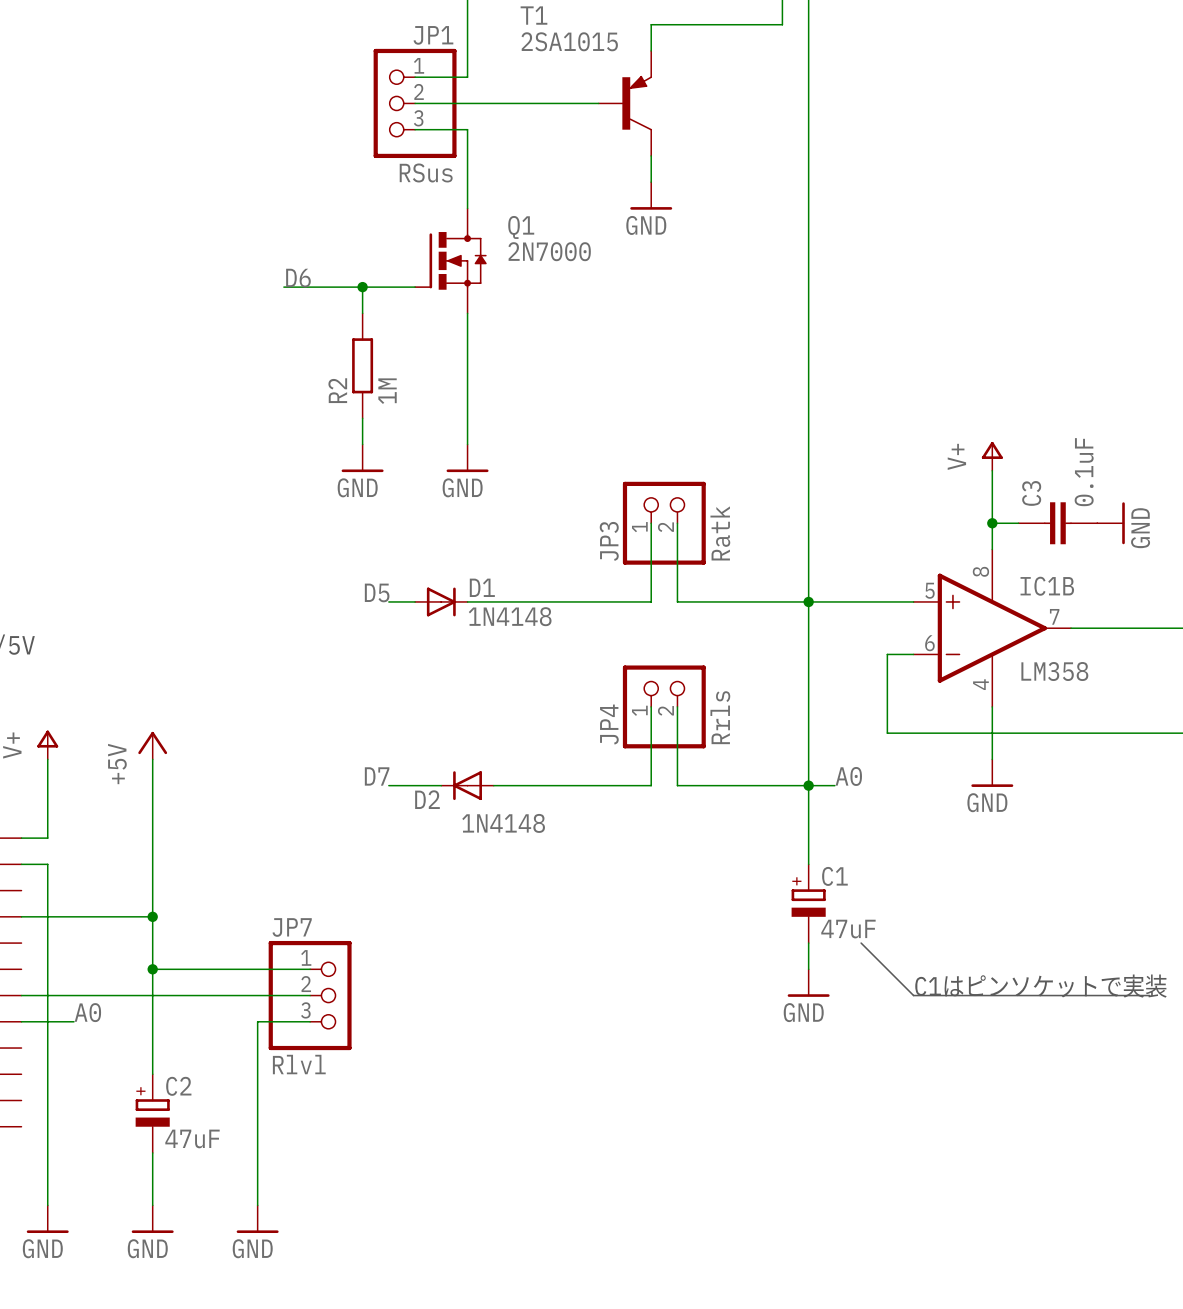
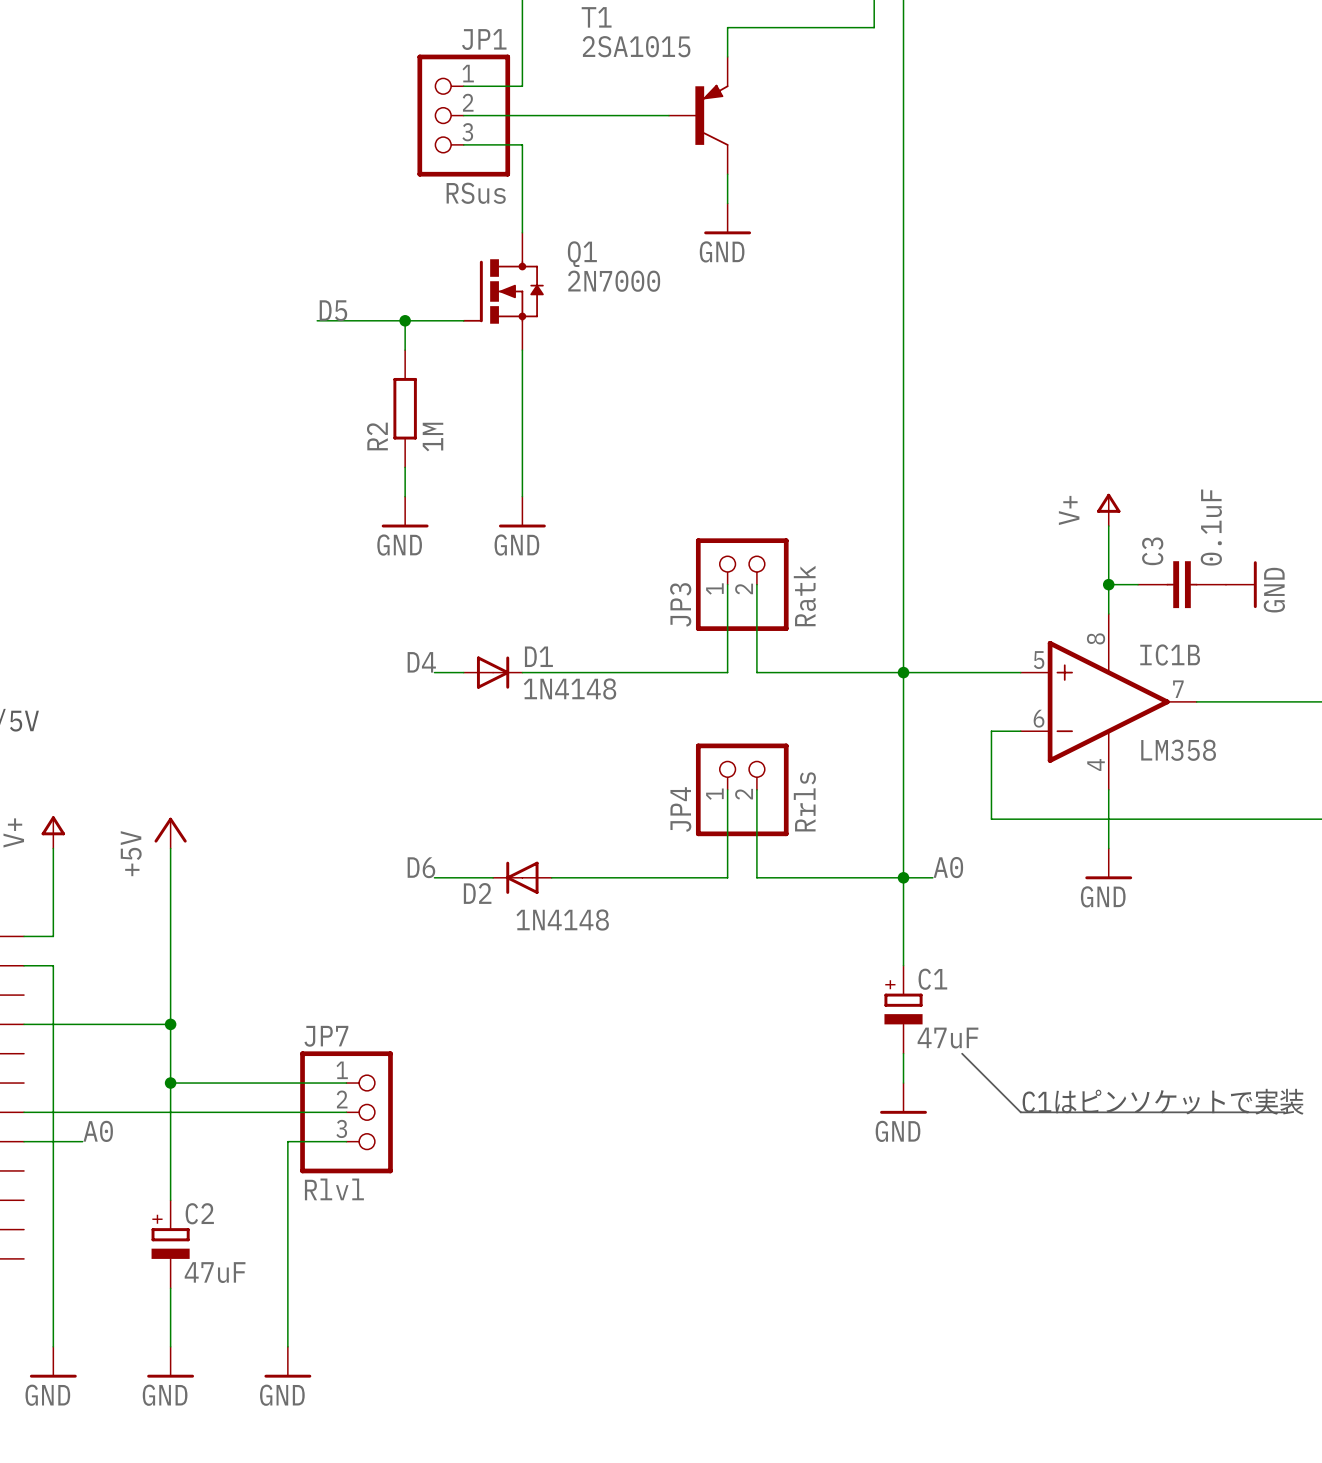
label: D6 (298, 278) -> D5 (333, 310)
label: D5 (377, 592) -> D4 (421, 662)
label: D7 (377, 776) -> D6 (421, 867)

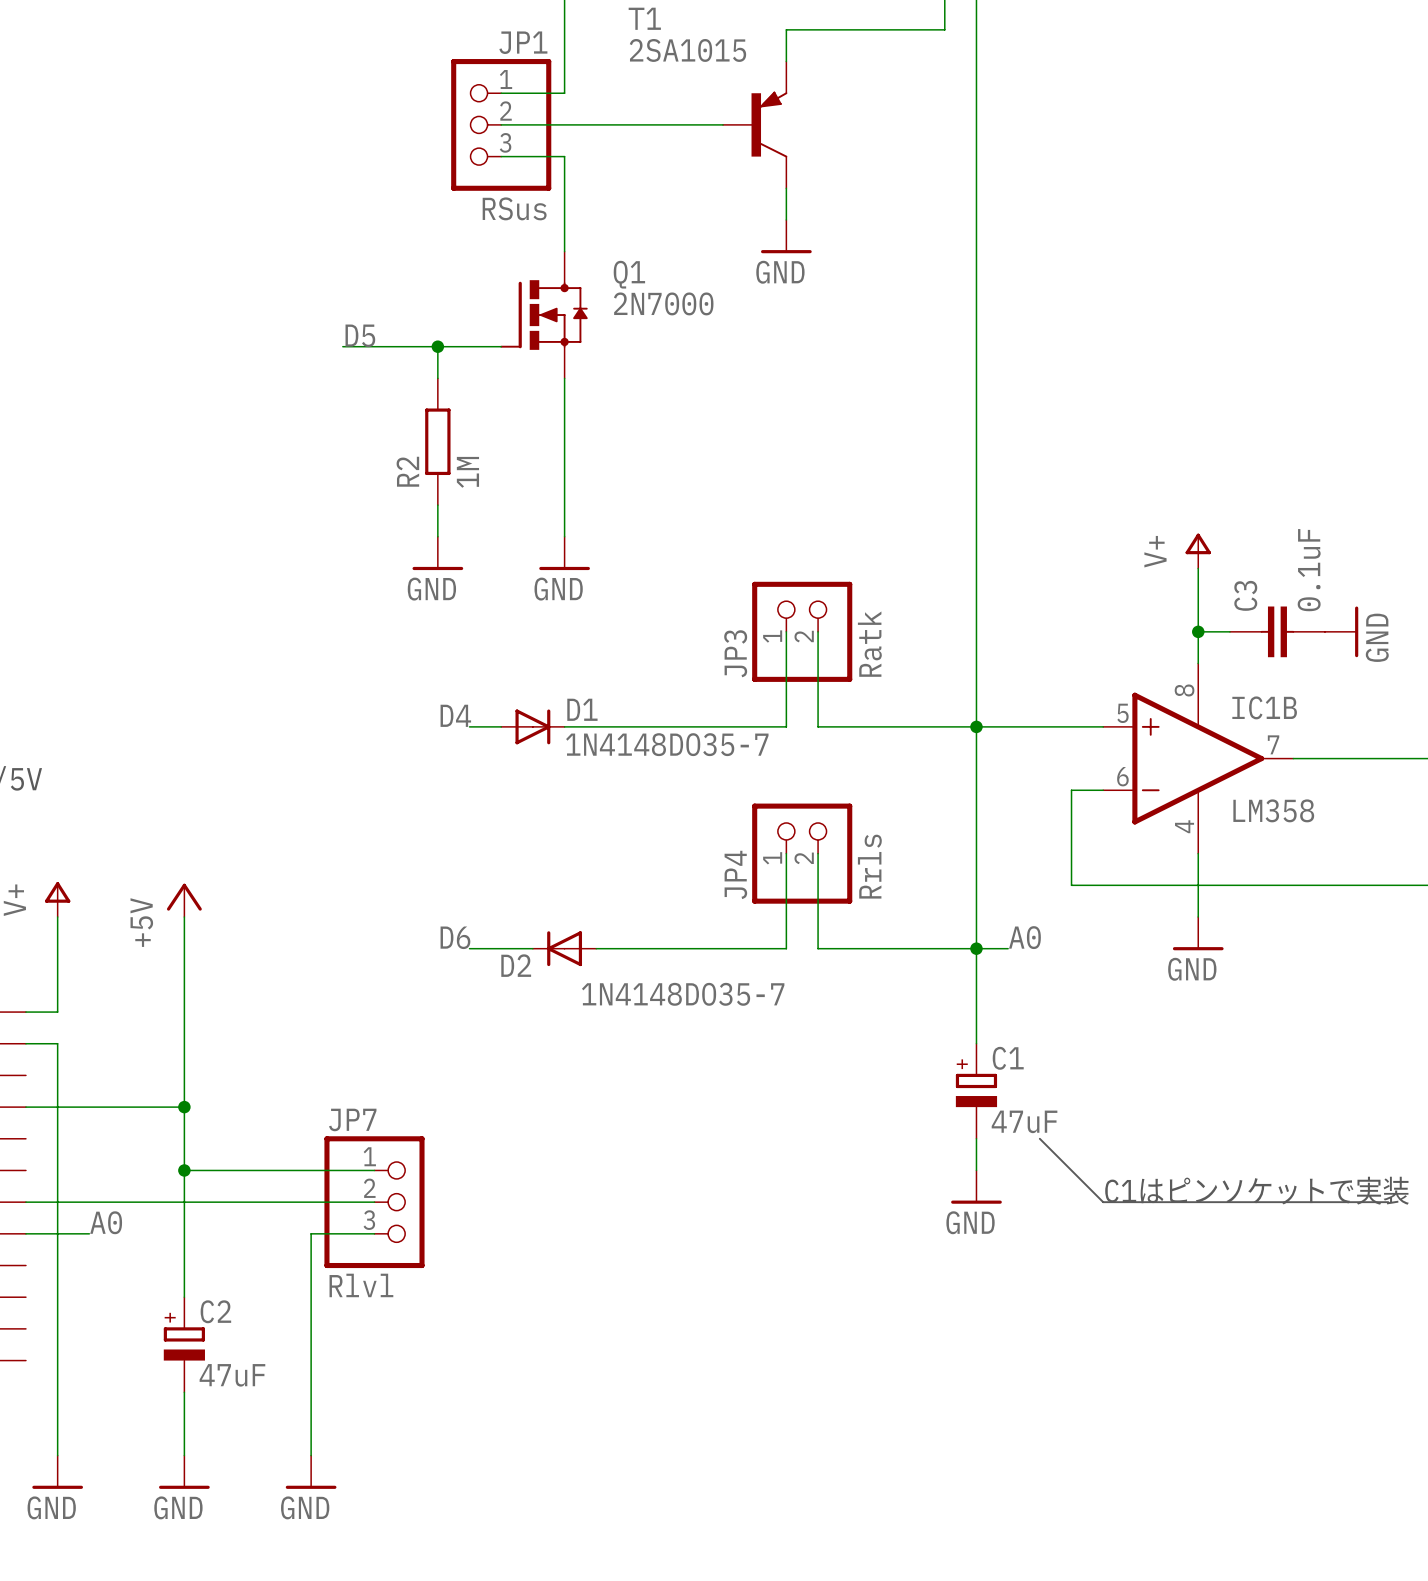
D1 value: 1N4148 (570, 689) -> 1N4148DO35-7 (667, 744)
D2 value: 1N4148 (562, 920) -> 1N4148DO35-7 (683, 994)

